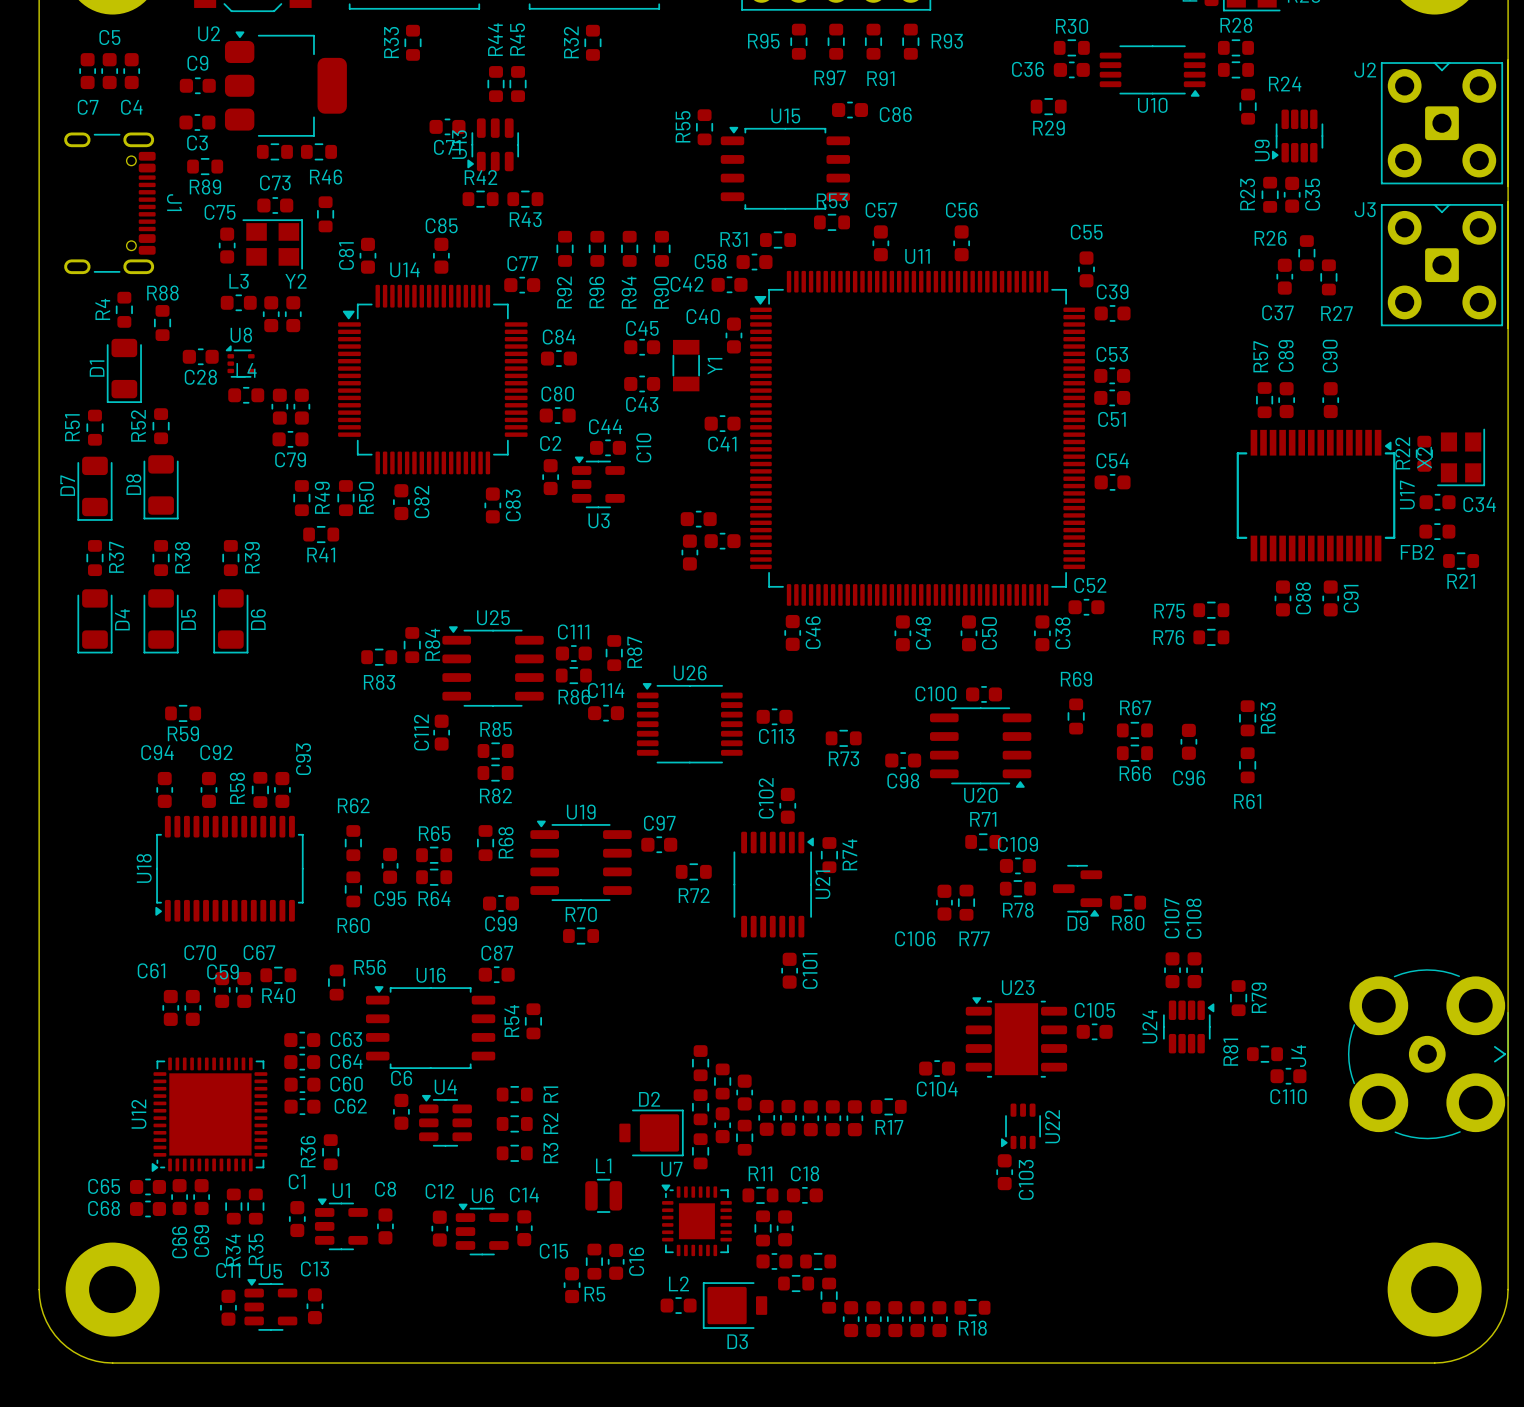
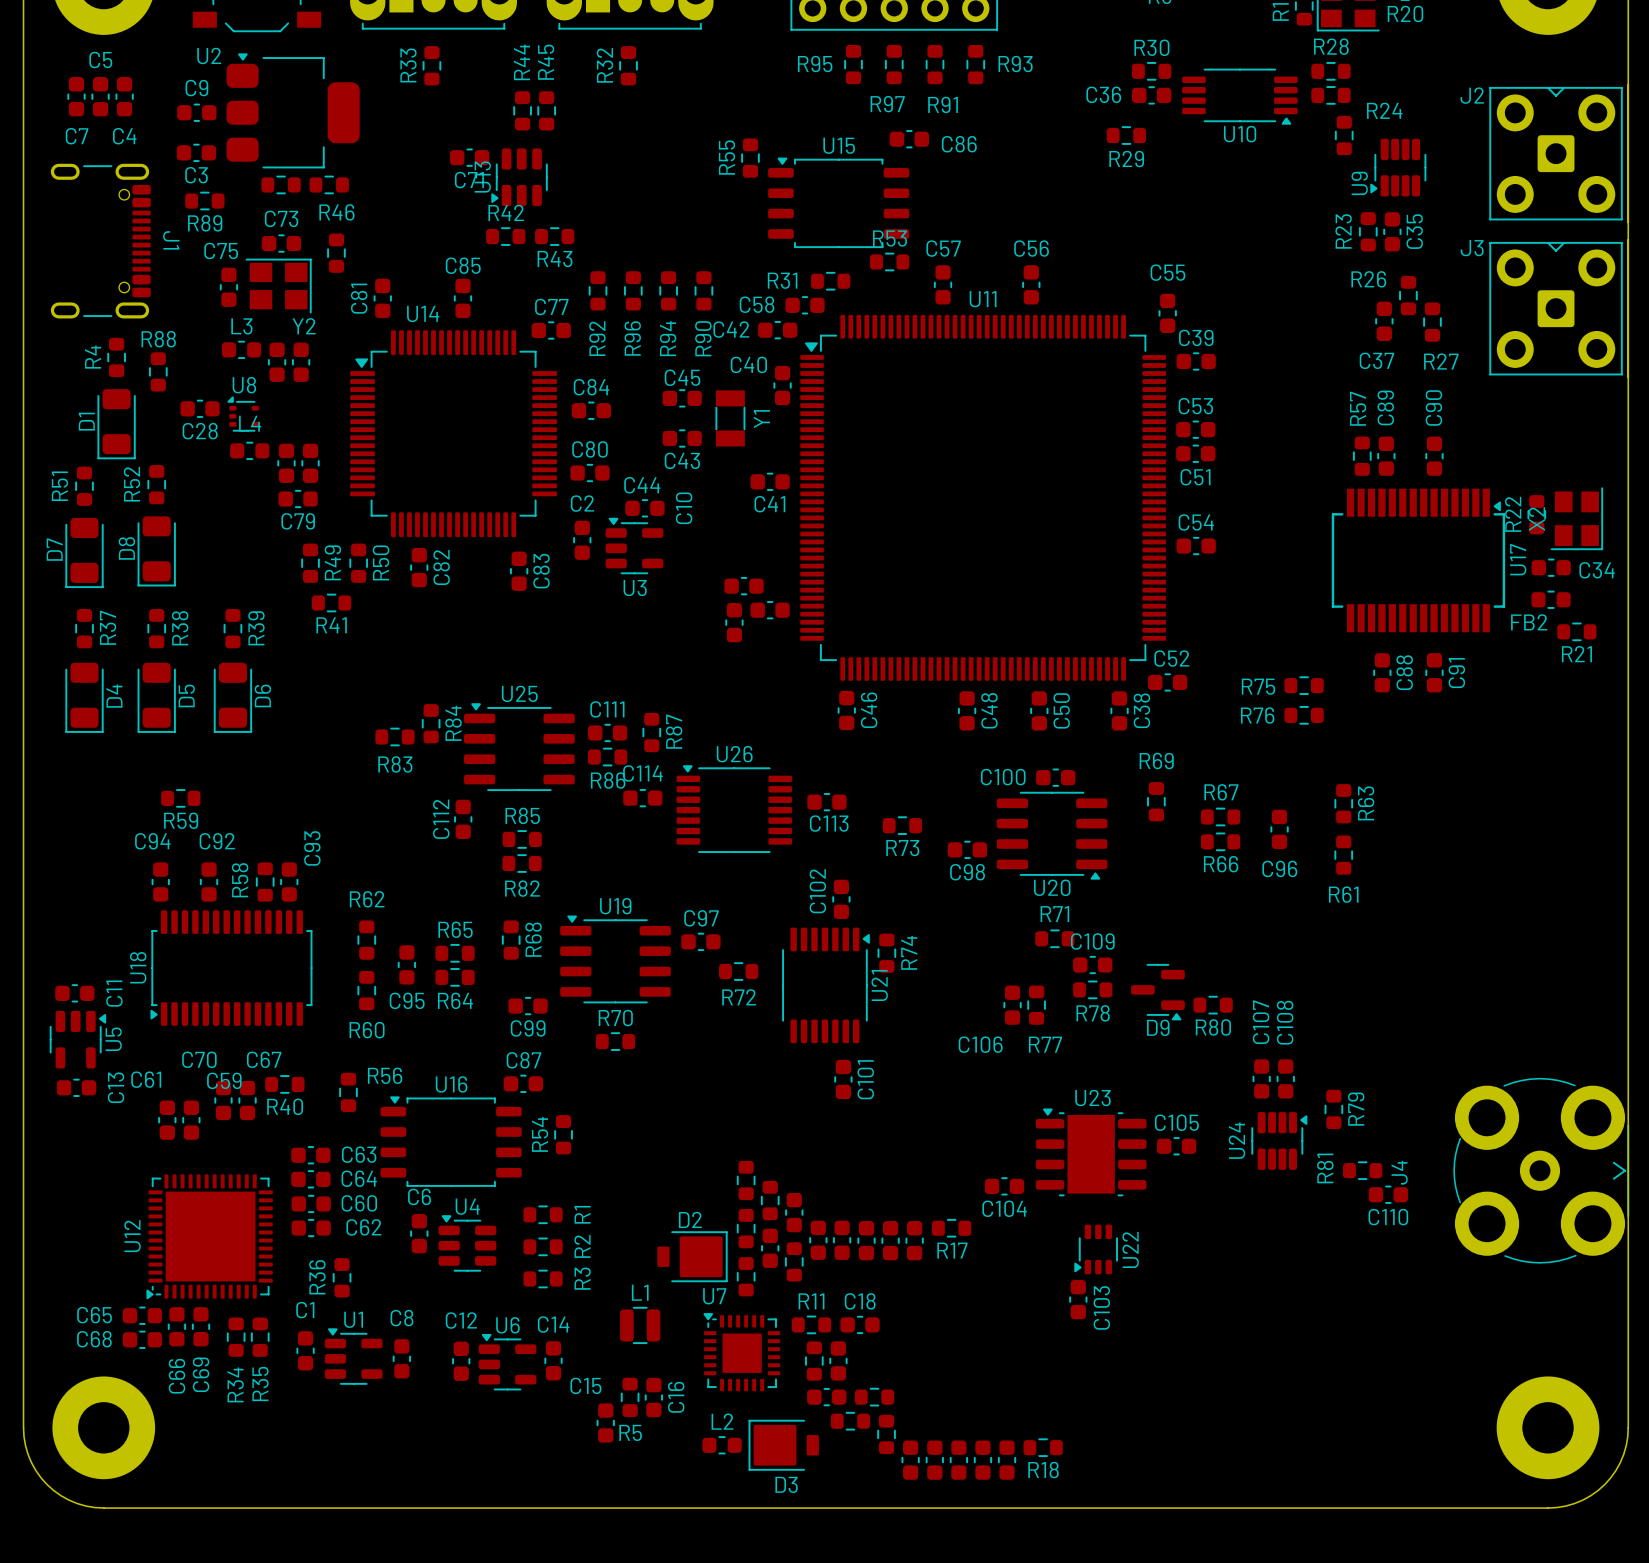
U5 rotation: 0° (270, 1304) -> 90° clockwise (77, 1039)
U5 position: (270, 1304) -> (77, 1039)
C13 rotation: 0° (314, 1306) -> 90° clockwise (76, 1087)
C13 position: (314, 1306) -> (76, 1087)
C11 rotation: 0° (228, 1307) -> 90° clockwise (74, 993)
C11 position: (228, 1307) -> (74, 993)

